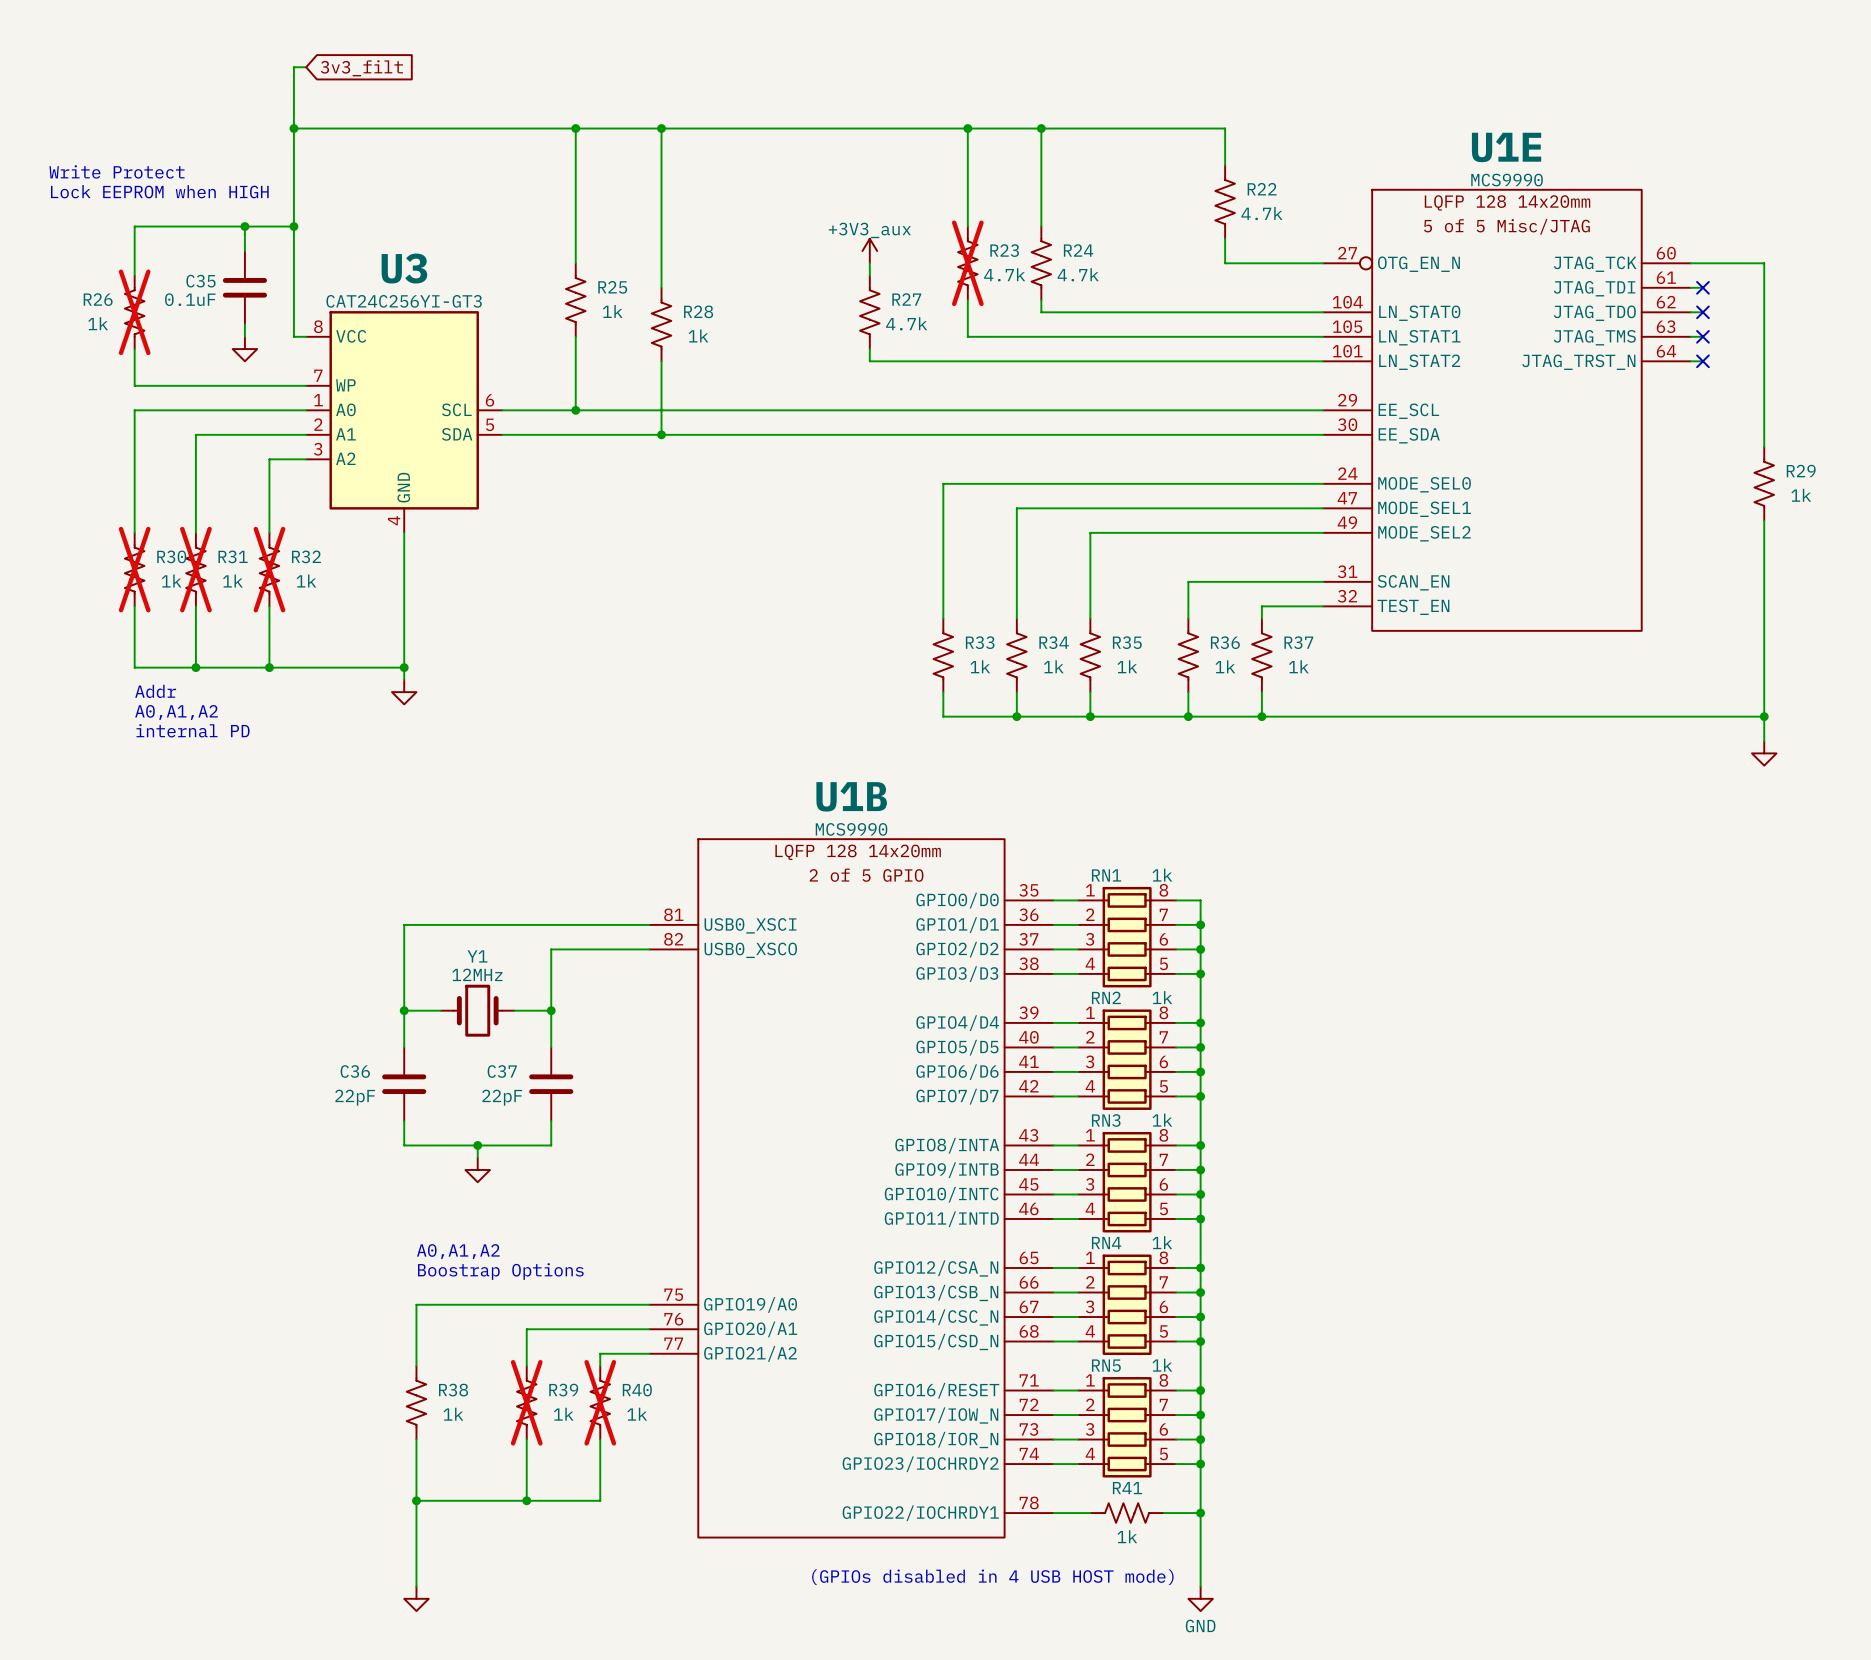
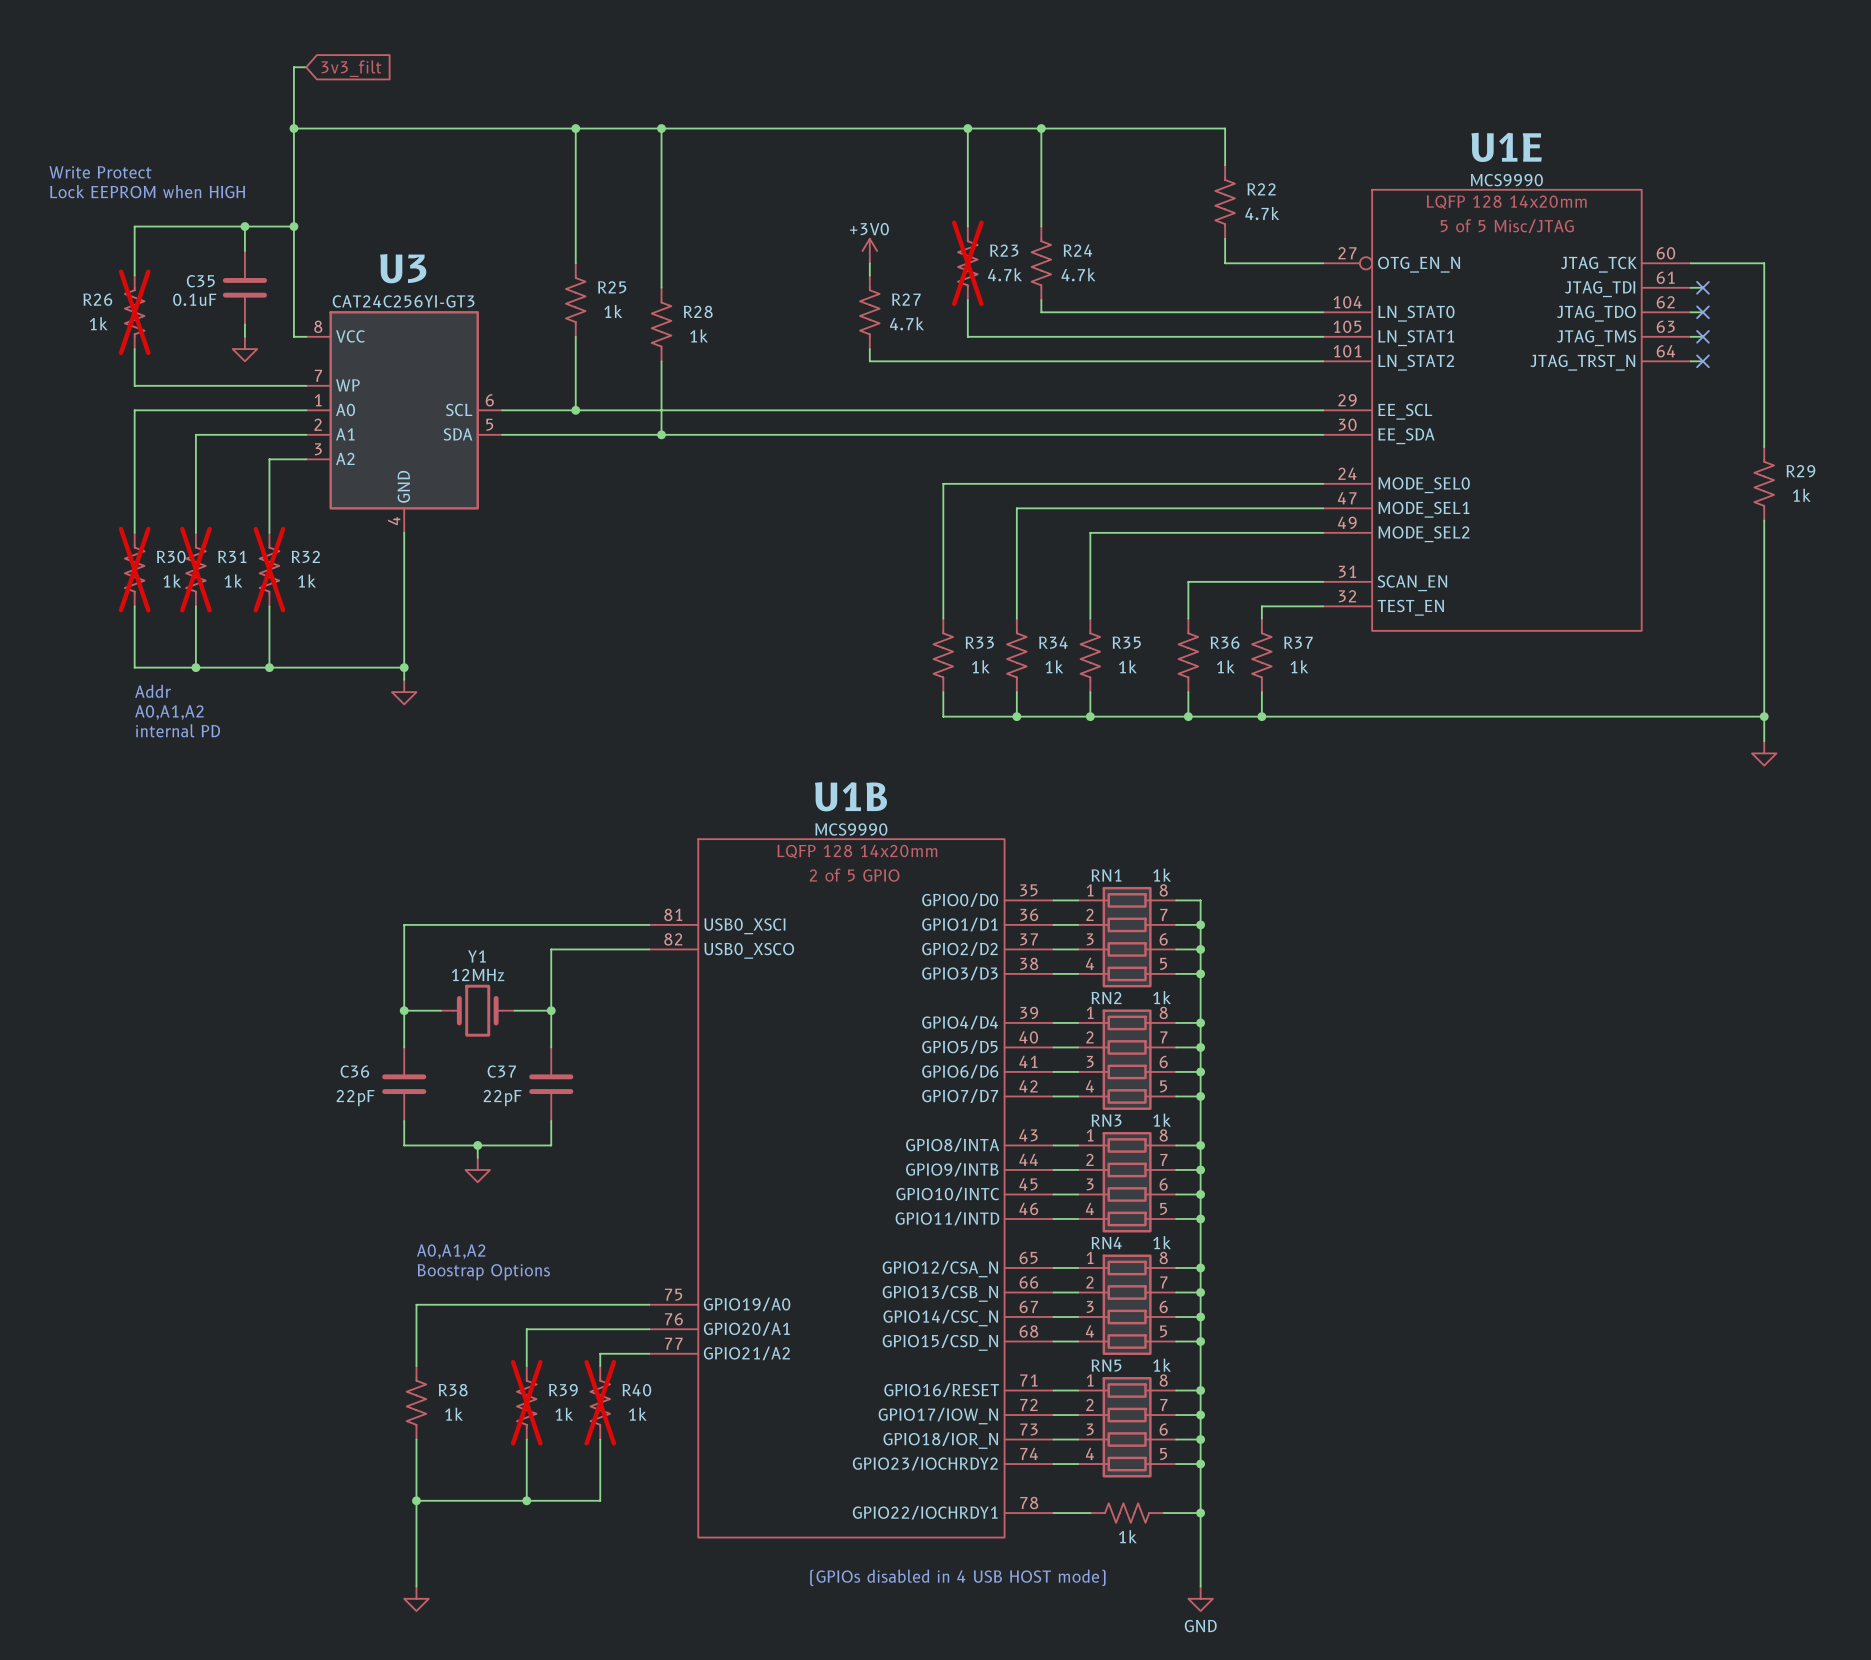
power symbol: +3V3_aux (869, 251) -> +3V0 (869, 251)
R41 name: R41 (1127, 1488) -> none

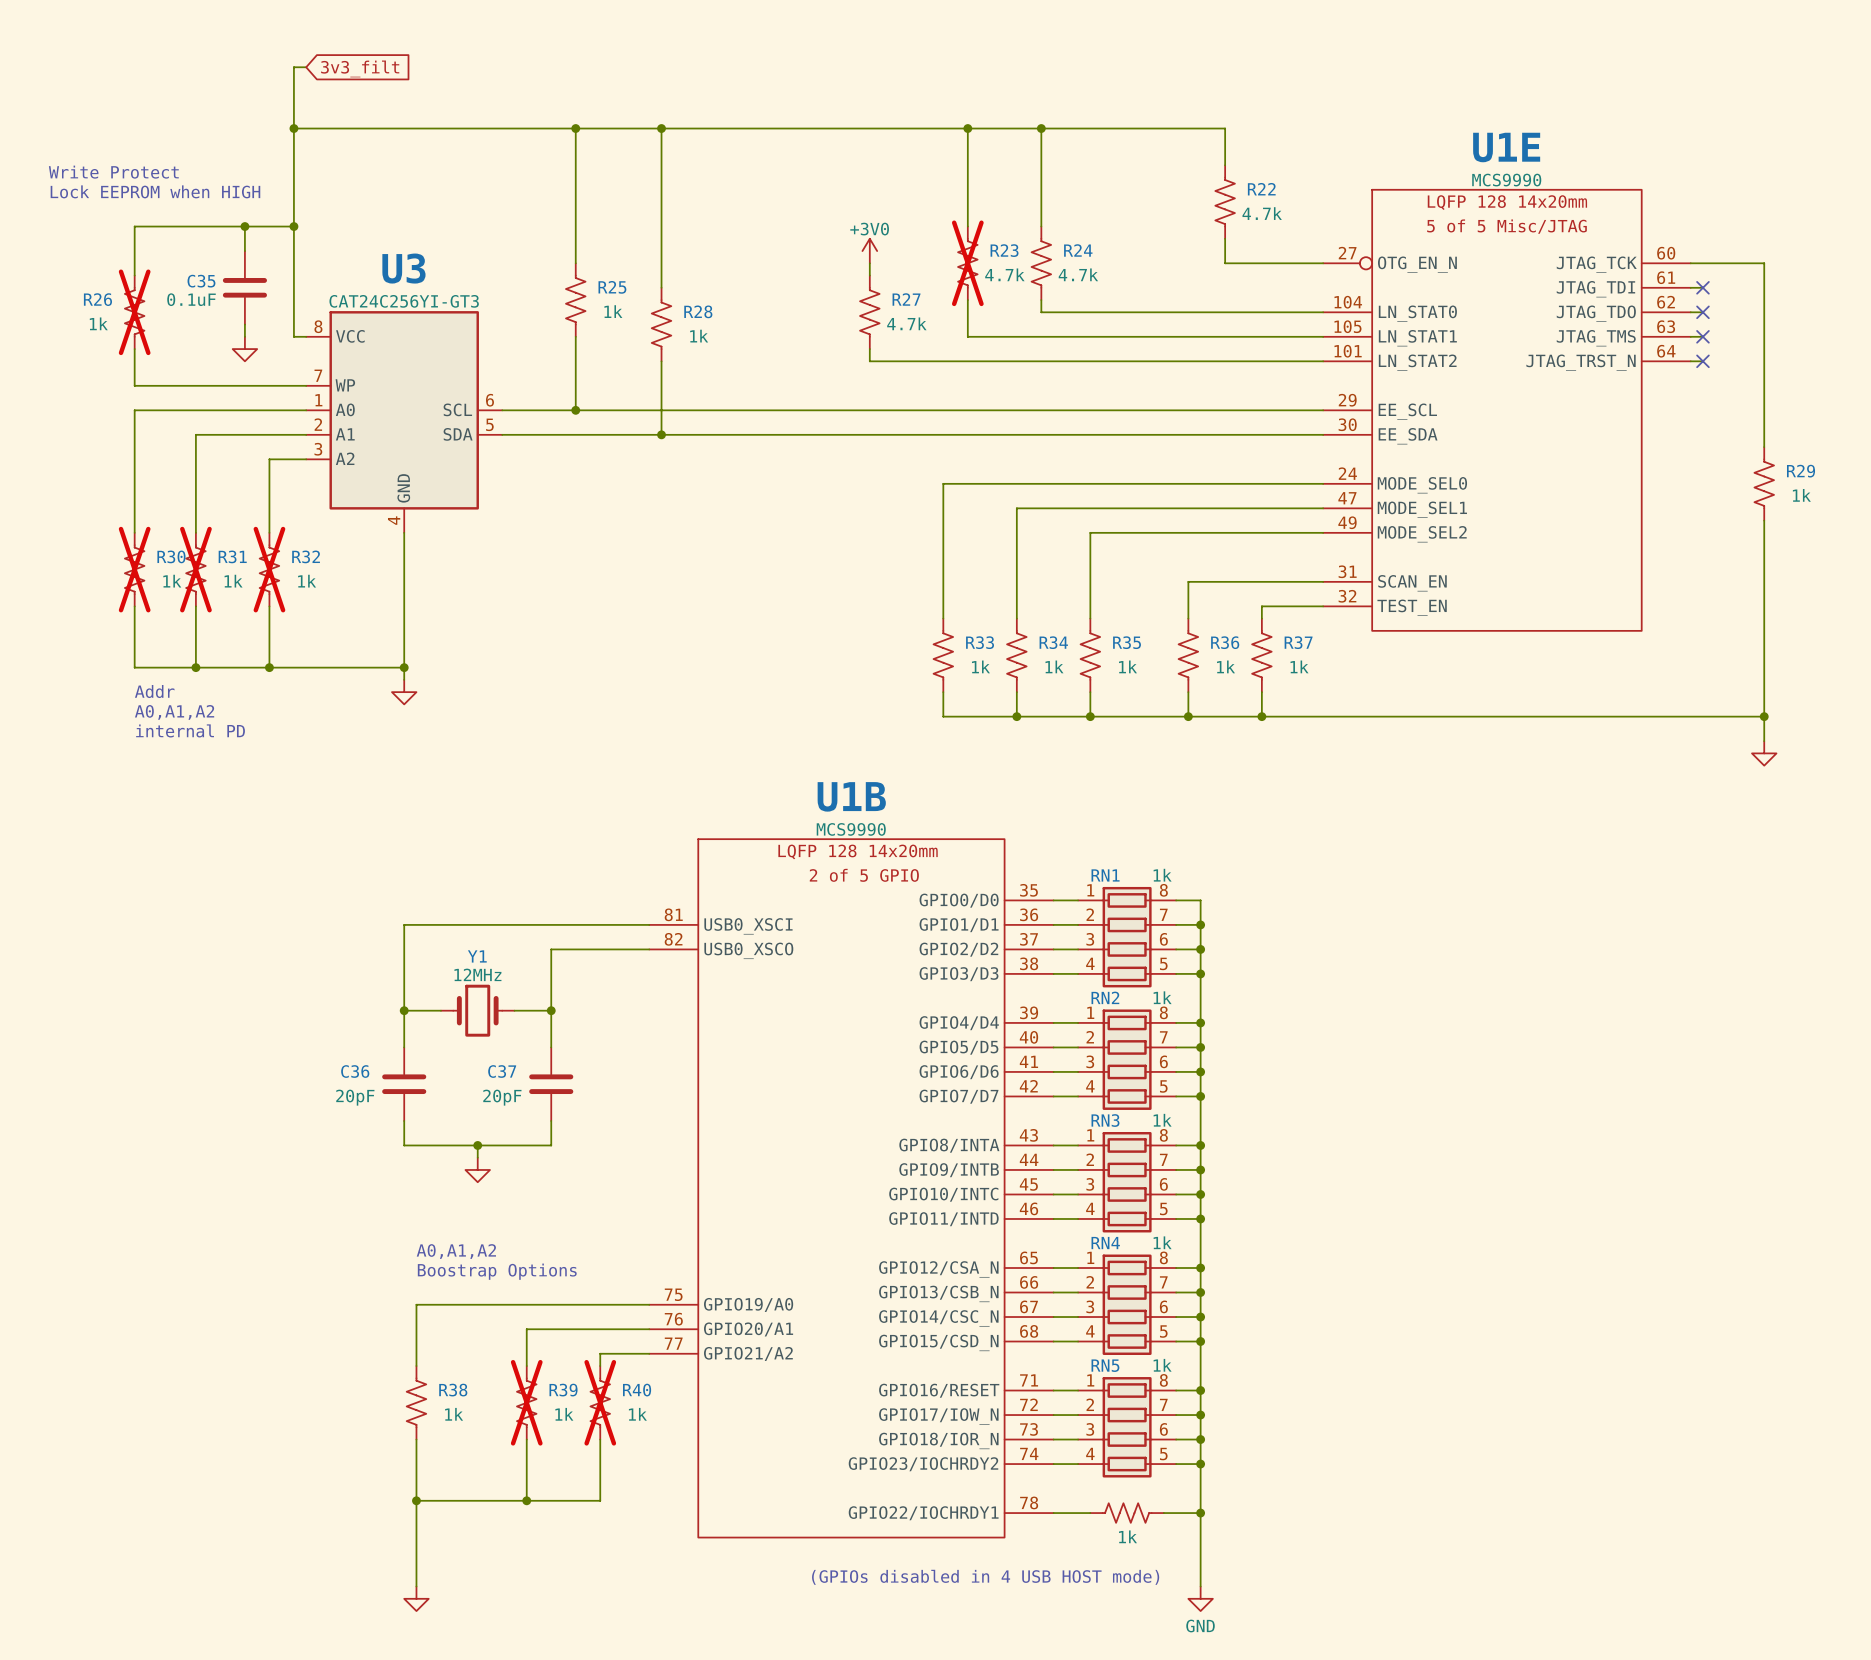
C36 value: 22pF (355, 1098) -> 20pF (355, 1097)
C37 value: 22pF (502, 1098) -> 20pF (502, 1097)

